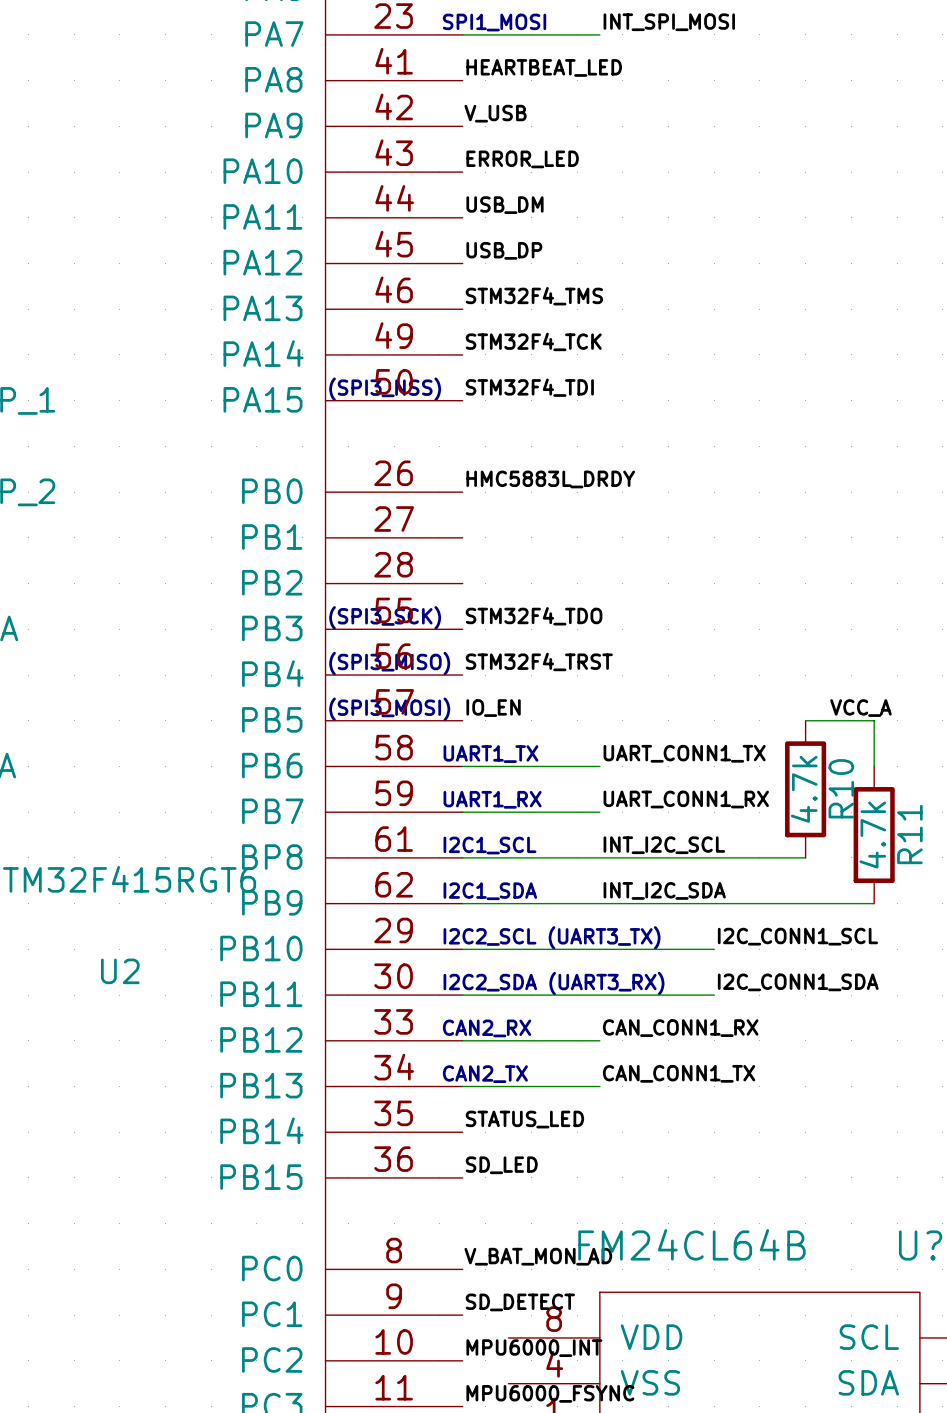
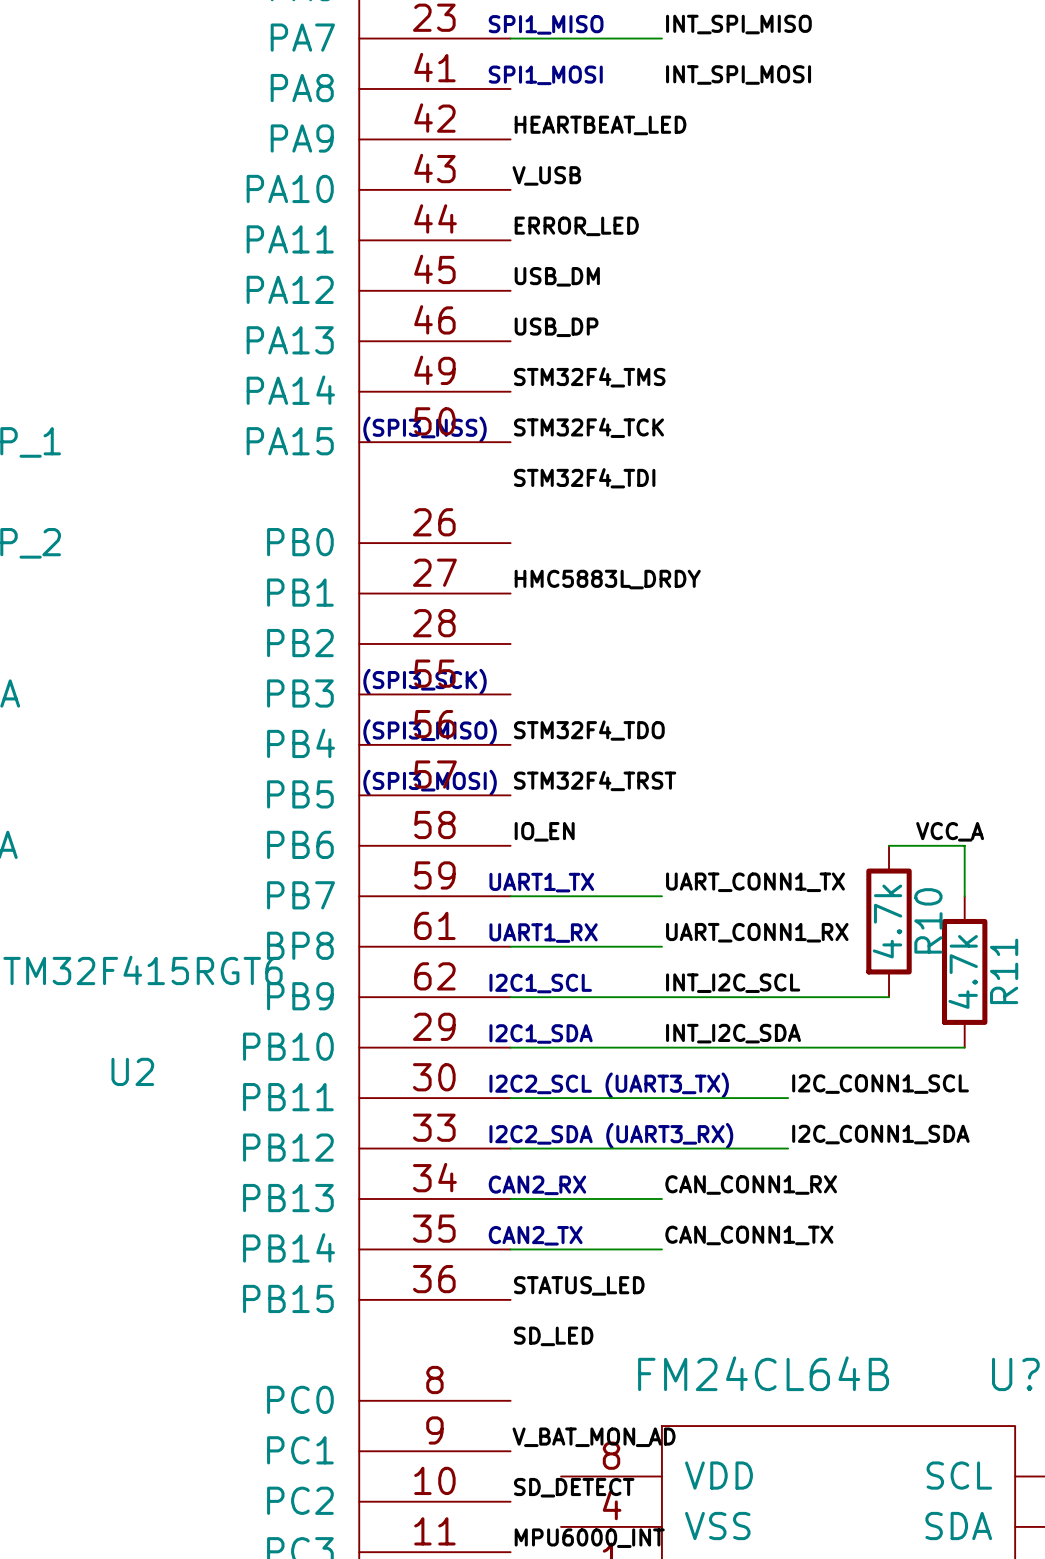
text: SPI1_MOSI (494, 22) -> SPI1_MISO (546, 24)
label: INT_SPI_MOSI (669, 22) -> INT_SPI_MISO (738, 24)
label: HEARTBEAT_LED (544, 67) -> none
label: none -> INT_SPI_MOSI (738, 74)
text: none -> SPI1_MOSI (545, 75)
label: V_USB (495, 113) -> HEARTBEAT_LED (600, 125)
label: ERROR_LED (522, 159) -> V_USB (546, 175)
label: USB_DM (504, 205) -> ERROR_LED (576, 226)
label: USB_DP (504, 250) -> USB_DM (557, 276)
label: STM32F4_TMS (534, 296) -> USB_DP (556, 327)
label: STM32F4_TCK (533, 341) -> STM32F4_TMS (589, 377)
label: STM32F4_TDI (529, 387) -> STM32F4_TCK (588, 427)
label: none -> STM32F4_TDI (584, 478)
label position: HMC5883L_DRDY (550, 479) -> HMC5883L_DRDY (607, 579)
label: STM32F4_TDO (534, 616) -> none
label: STM32F4_TRST (539, 662) -> STM32F4_TDO (589, 730)
label: IO_EN (493, 708) -> STM32F4_TRST (595, 781)
label position: VCC_A (860, 708) -> VCC_A (950, 831)
wire: (805, 720) (874, 720) (874, 766) -> (889, 845) (964, 845) (964, 896)
label: none -> IO_EN (544, 831)
label: UART_CONN1_TX (684, 753) -> none
text: UART1_TX (490, 754) -> none
wire: (462, 766) (599, 766) -> (510, 1249) (661, 1249)
R10 position: (805, 789) -> (889, 921)
text: UART1_RX (492, 799) -> UART1_TX (541, 882)
label: UART_CONN1_RX (686, 799) -> UART_CONN1_TX (755, 882)
R11 position: (874, 835) -> (964, 971)
text: I2C1_SCL (489, 845) -> UART1_RX (543, 933)
label: INT_I2C_SCL (664, 845) -> UART_CONN1_RX (757, 932)
wire: (599, 857) (805, 857) -> none
label: INT_I2C_SDA (664, 890) -> INT_I2C_SCL (733, 983)
text: I2C1_SDA (490, 891) -> I2C1_SCL (540, 983)
wire: (805, 903) (874, 903) -> none
label: none -> INT_I2C_SDA (733, 1033)
label: I2C_CONN1_SCL (797, 936) -> none
text: I2C2_SCL (UART3_TX) (552, 937) -> I2C1_SDA (541, 1033)
wire: none -> (788, 1047) (964, 1047)
label: I2C_CONN1_SDA (798, 982) -> I2C_CONN1_SCL (880, 1084)
text: I2C2_SDA (UART3_RX) (553, 983) -> I2C2_SCL (UART3_TX) (609, 1085)
text: CAN2_RX (487, 1028) -> I2C2_SDA (UART3_RX) (611, 1135)
label: CAN_CONN1_RX (680, 1028) -> I2C_CONN1_SDA (880, 1134)
wire: none -> (661, 1148) (788, 1148)
label: CAN_CONN1_TX (679, 1073) -> CAN_CONN1_RX (751, 1184)
text: CAN2_TX (485, 1074) -> CAN2_RX (537, 1185)
text: none -> CAN2_TX (535, 1235)
label: STATUS_LED (524, 1119) -> none
label: none -> CAN_CONN1_TX (749, 1235)
label: SD_LED (501, 1165) -> STATUS_LED (579, 1285)
label: none -> SD_LED (553, 1336)
label: V_BAT_MON_AD (538, 1256) -> none
label: SD_DETECT (520, 1302) -> V_BAT_MON_AD (594, 1437)
label: MPU6000_INT (534, 1348) -> SD_DETECT (574, 1487)
label: MPU6000_FSYNC (550, 1393) -> MPU6000_INT (589, 1538)

